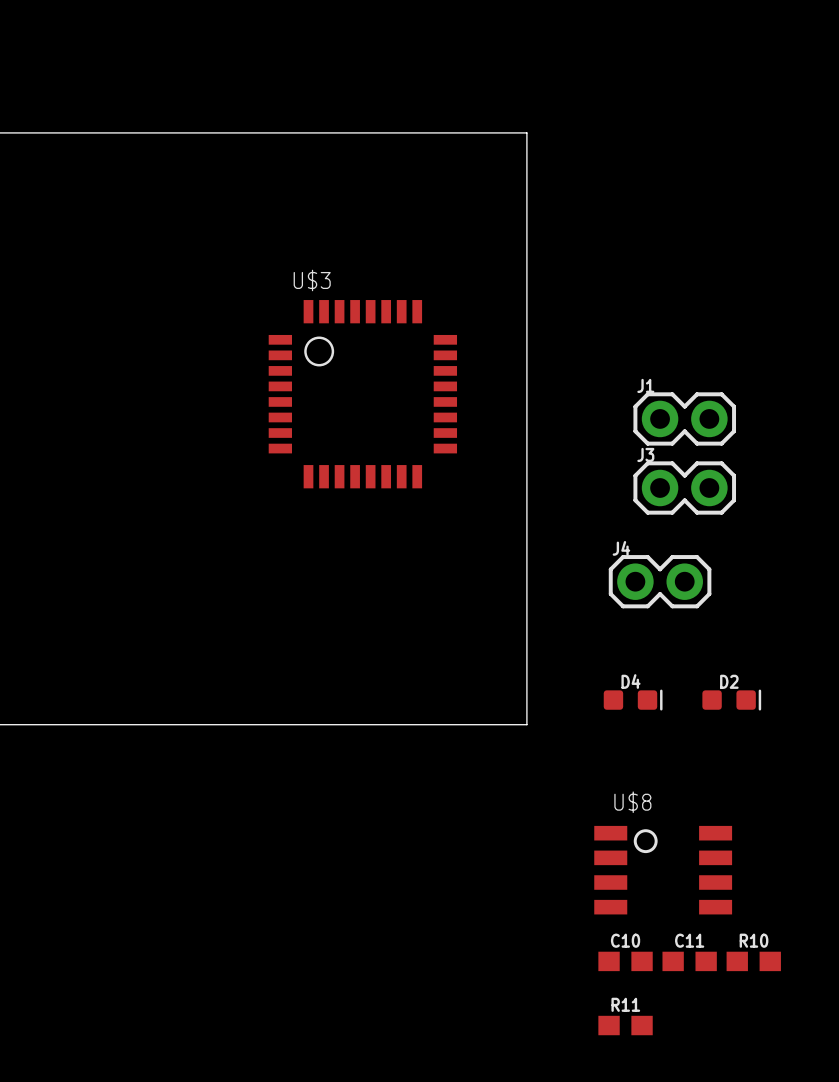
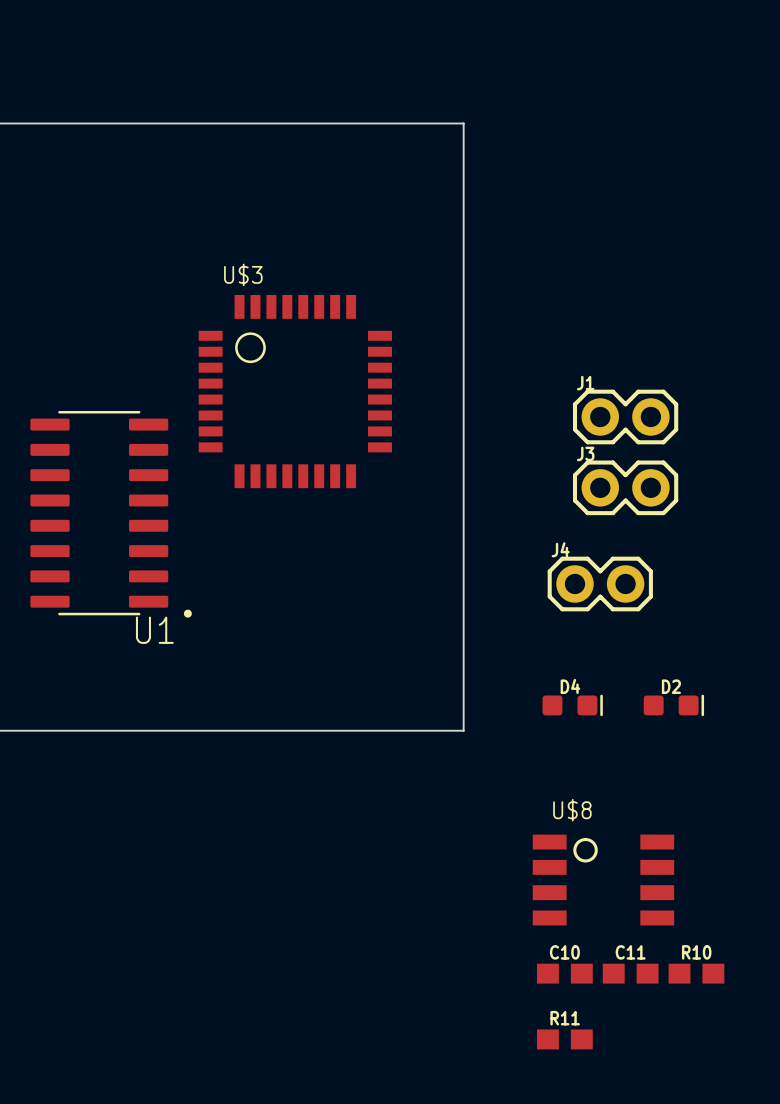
U1: none -> (111, 514)

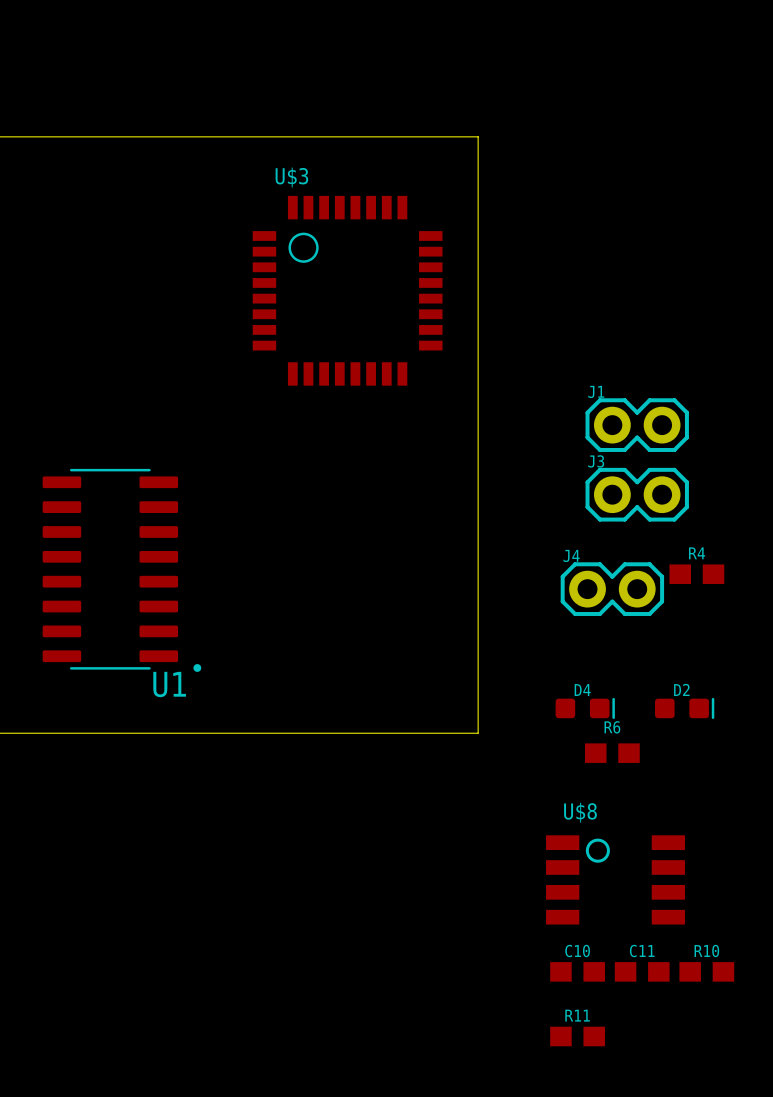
U$3 position: (295, 391) -> (347, 290)
U1 position: (111, 514) -> (121, 570)
R4: none -> (696, 574)
R6: none -> (612, 753)

